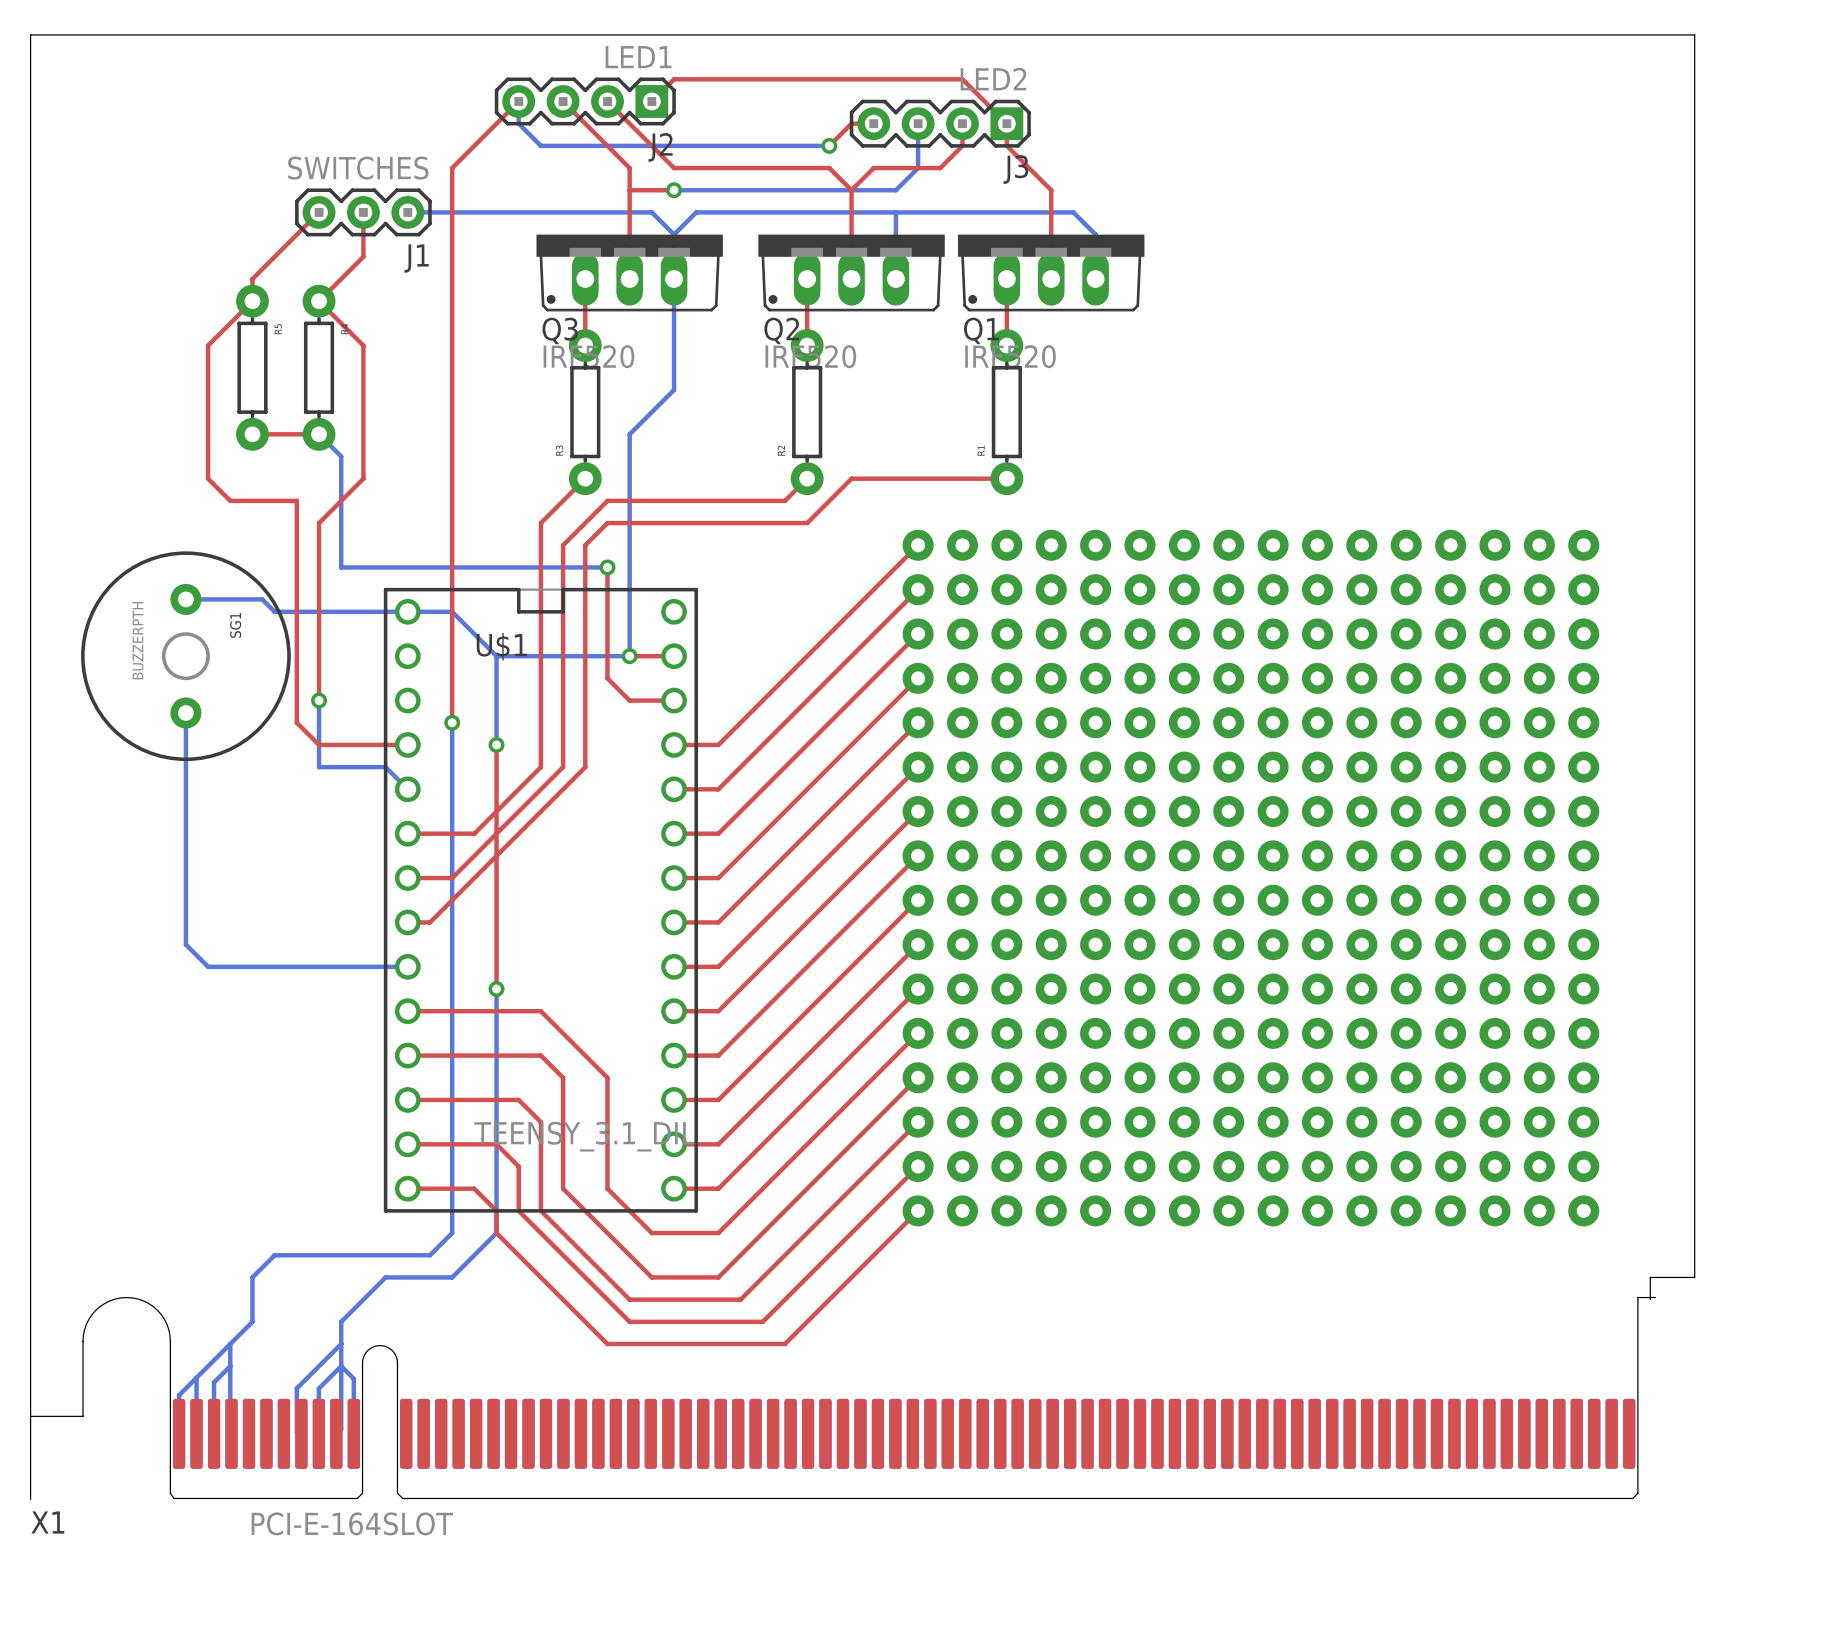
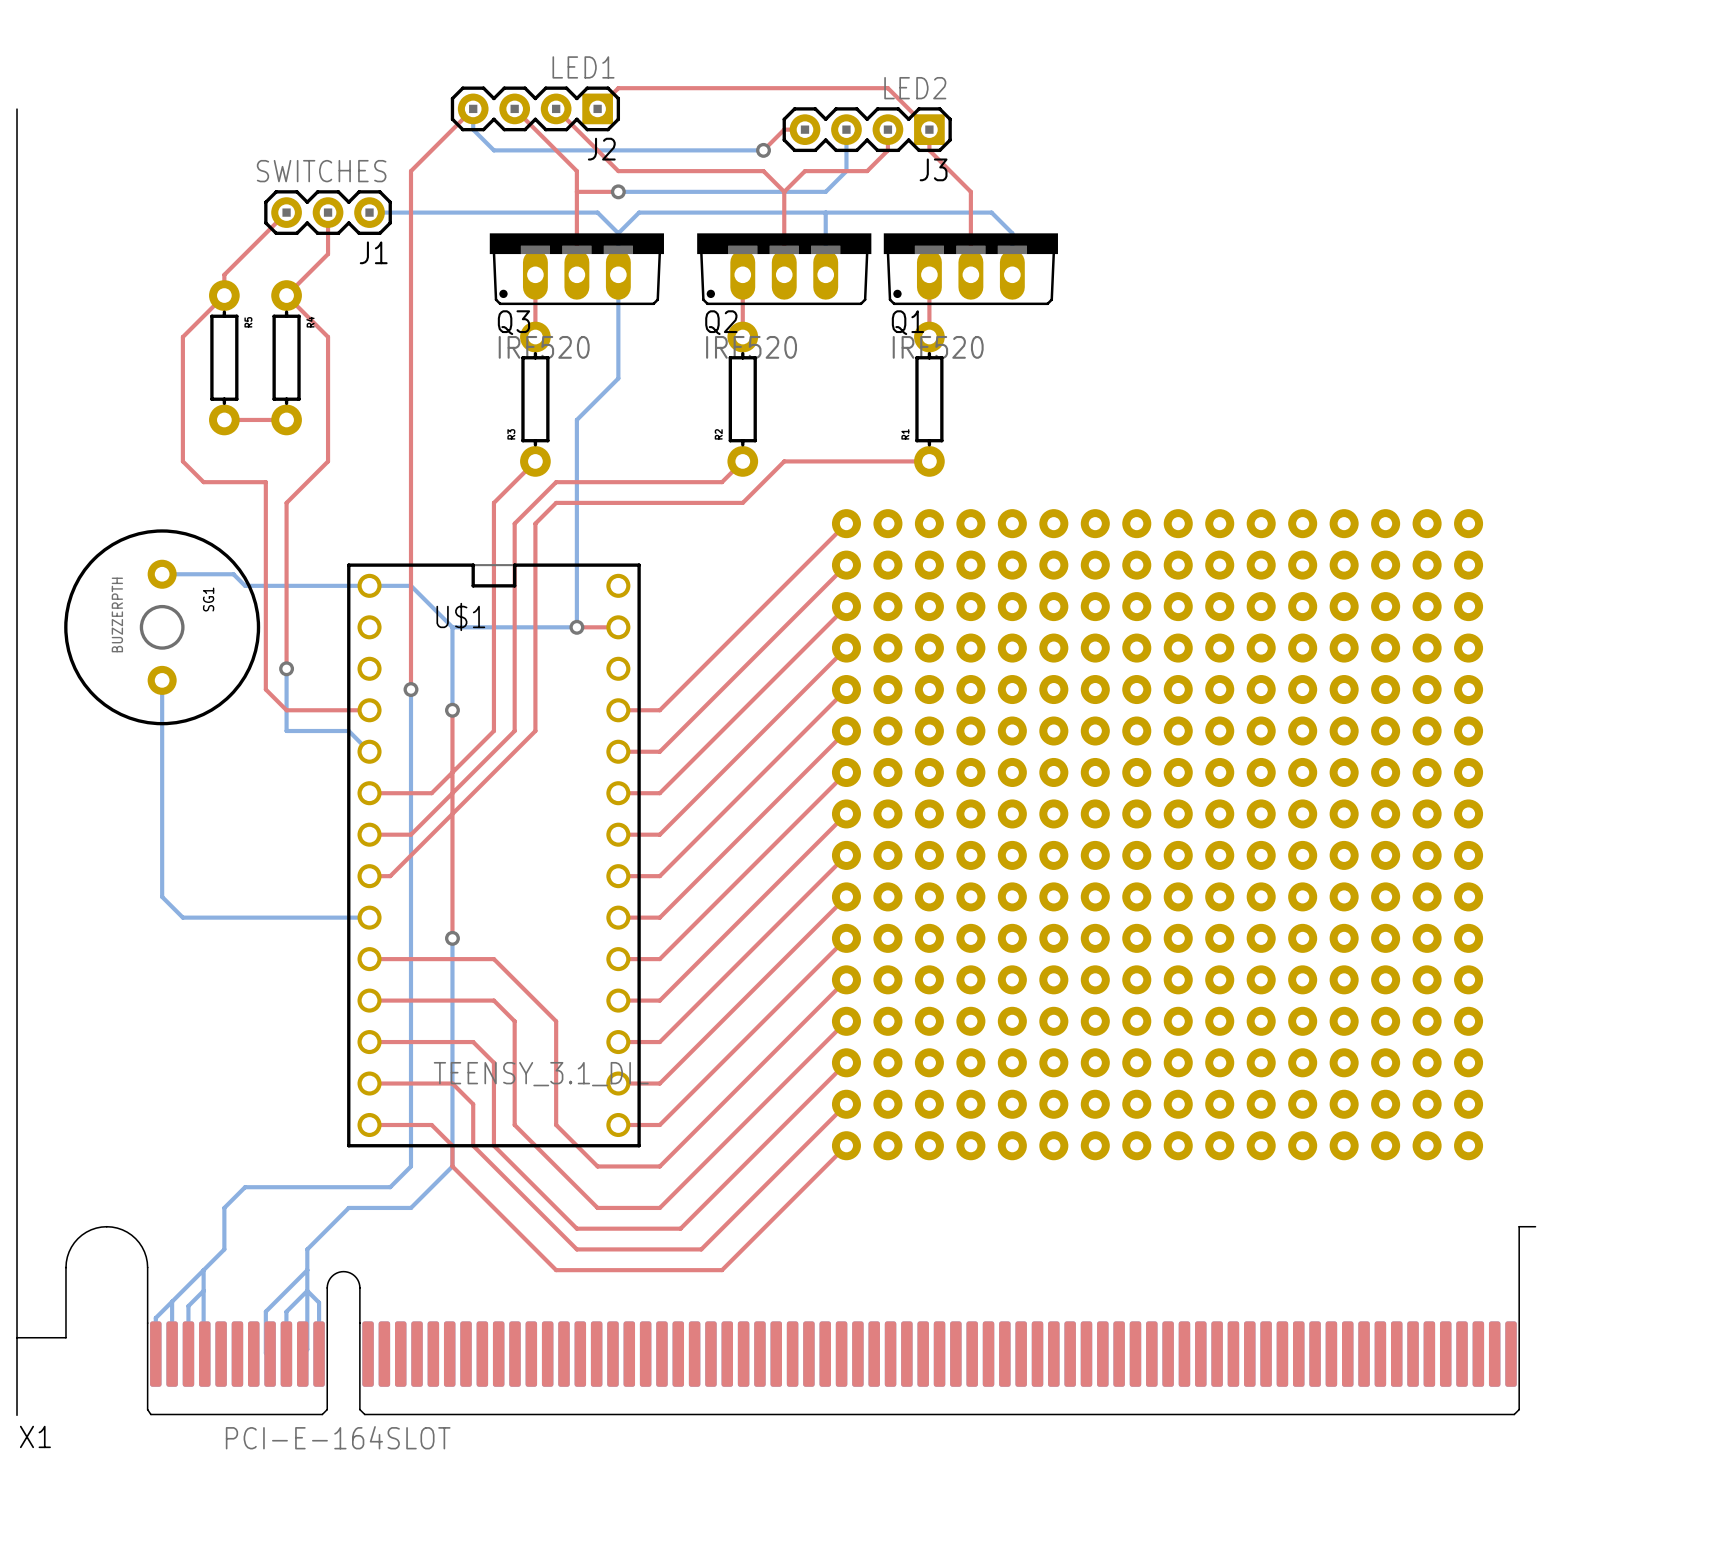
board edge: (30, 101) (30, 34) (1694, 34) (1694, 1277) (1650, 1277) (1650, 1299) -> none
bottom track: (319, 434) (341, 456) (341, 567) (607, 567) -> none
top track: (607, 567) (607, 678) (629, 700) (674, 700) -> none
via: (607, 567) -> none

